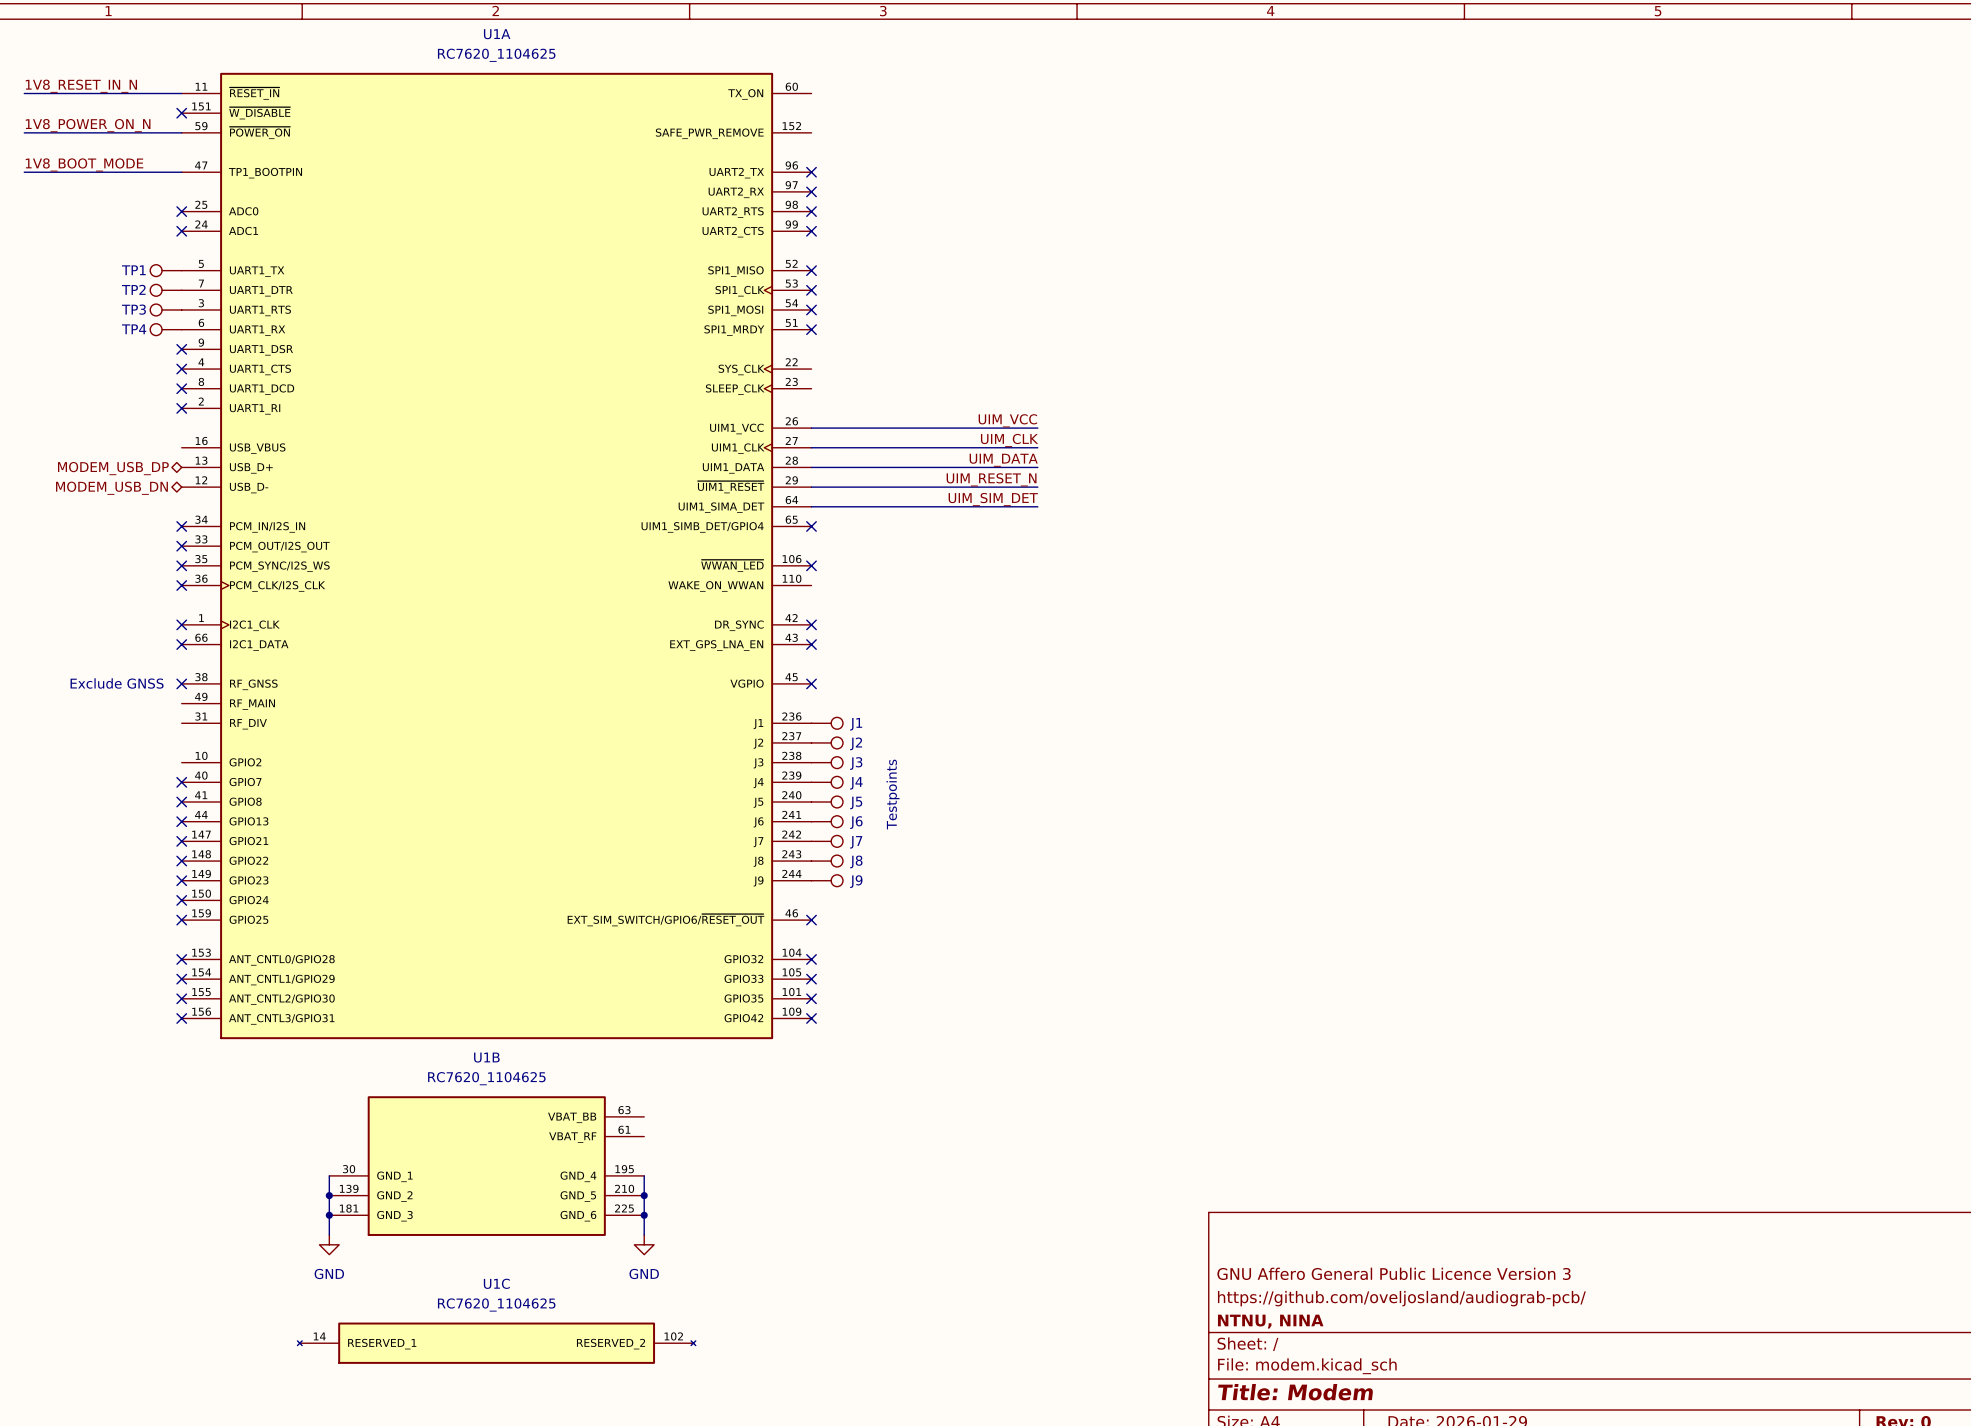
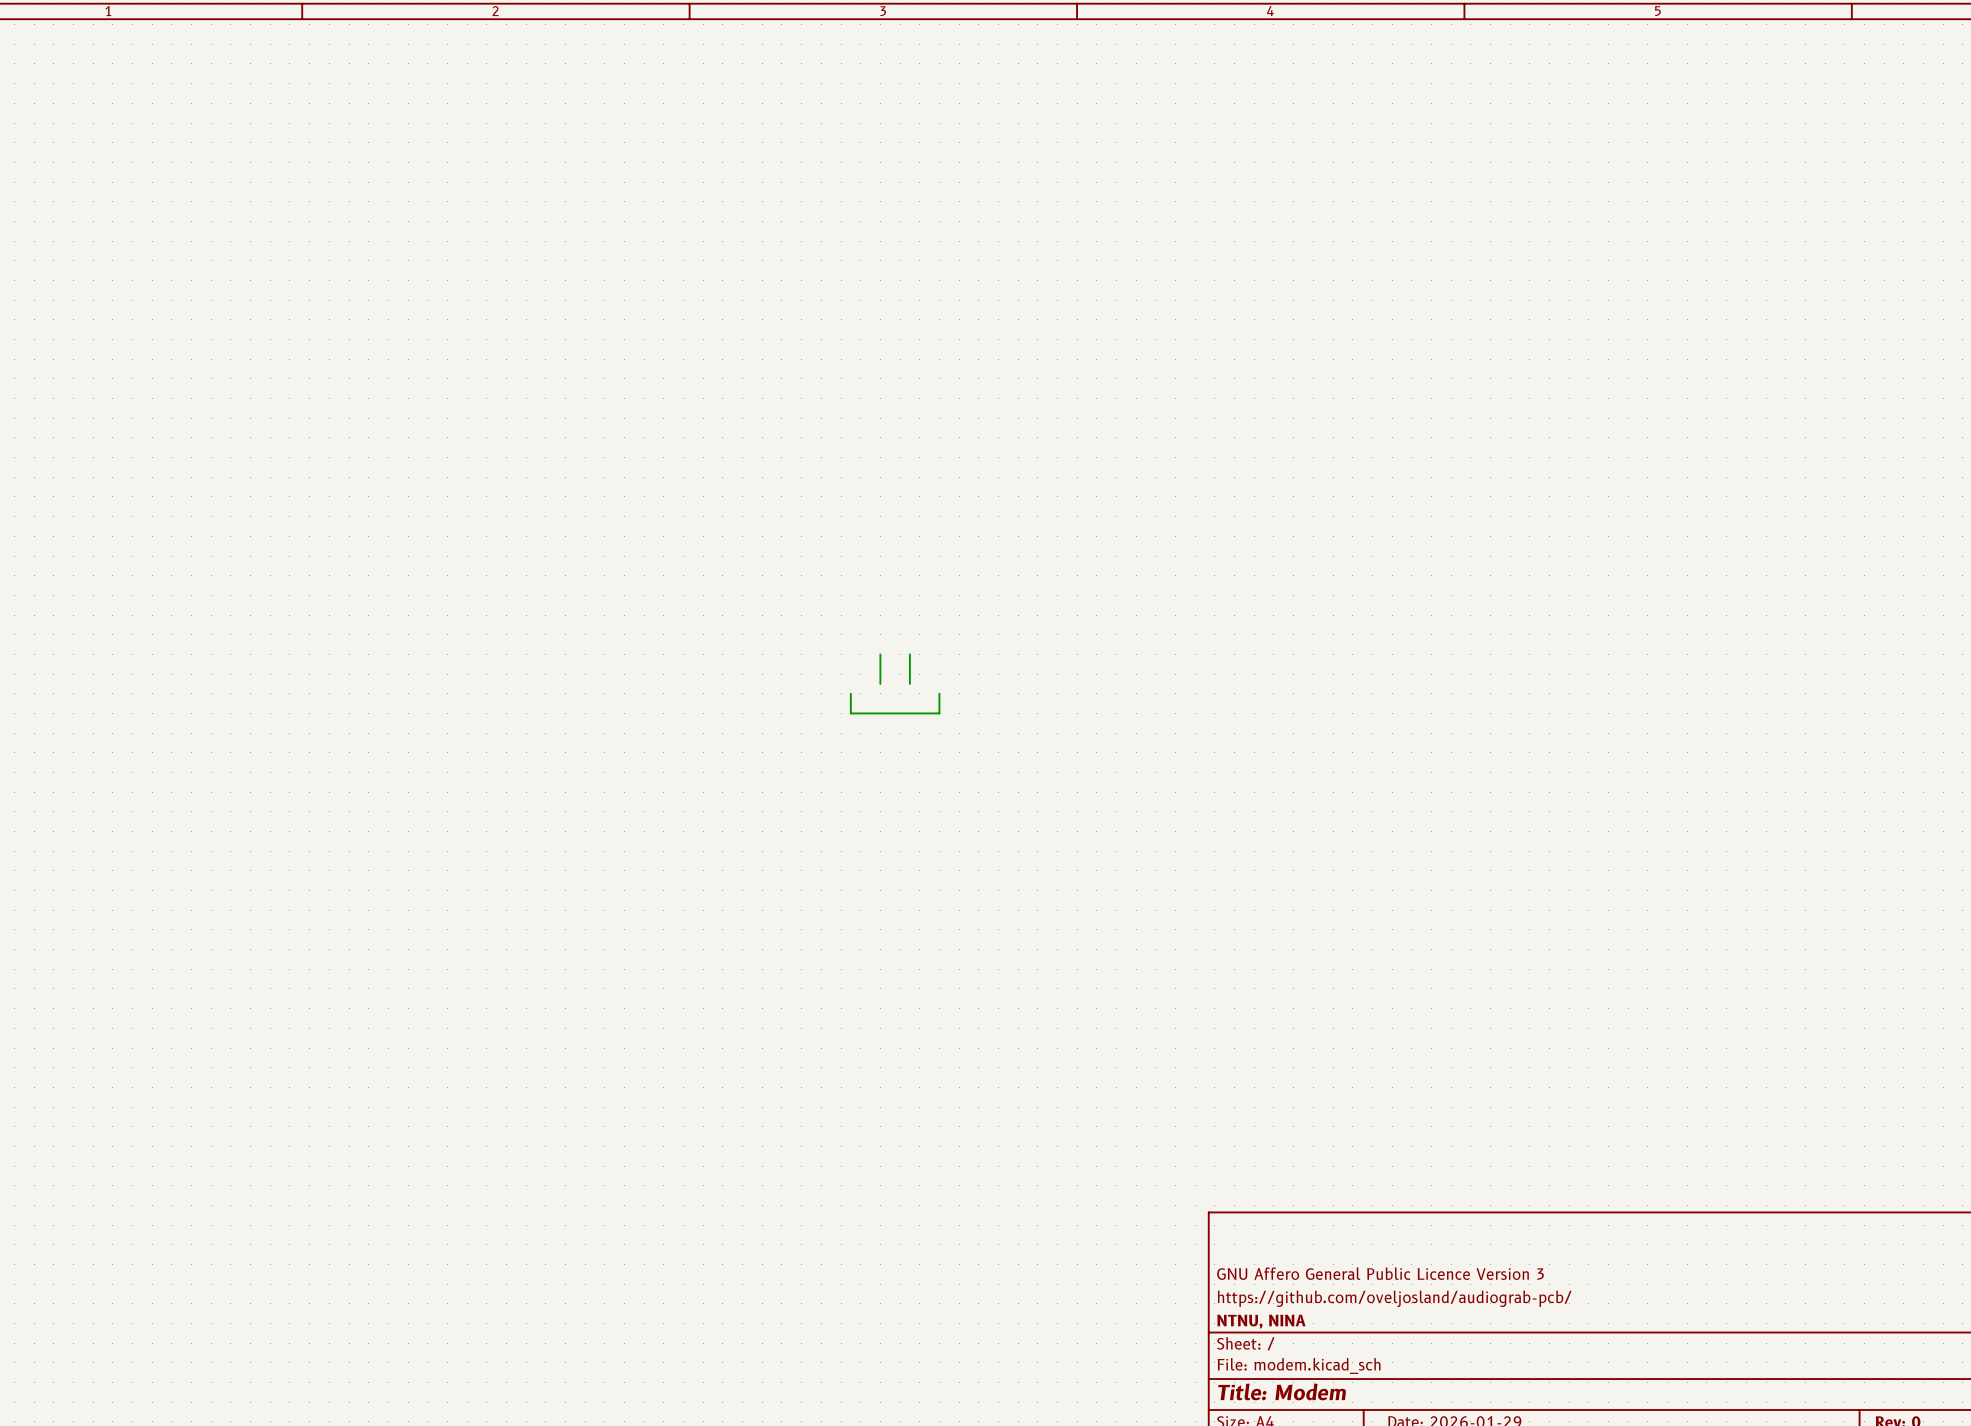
label: 1V8_RESET_IN_N (81, 86) -> none
wire: (24, 93) (181, 93) -> none
no-connect mark: (181, 113) -> none
label: 1V8_POWER_ON_N (88, 125) -> none
wire: (24, 132) (181, 132) -> none
label: 1V8_BOOT_MODE (84, 164) -> none
wire: (24, 172) (181, 172) -> none
no-connect mark: (811, 172) -> none
no-connect mark: (811, 191) -> none
no-connect mark: (181, 211) -> none
no-connect mark: (811, 211) -> none
no-connect mark: (181, 231) -> none
no-connect mark: (811, 231) -> none
TP1: (165, 270) -> none
no-connect mark: (811, 270) -> none
TP2: (165, 290) -> none
no-connect mark: (811, 290) -> none
TP3: (165, 309) -> none
no-connect mark: (811, 309) -> none
TP4: (165, 329) -> none
no-connect mark: (811, 329) -> none
no-connect mark: (181, 349) -> none
no-connect mark: (181, 369) -> none
no-connect mark: (181, 388) -> none
no-connect mark: (181, 408) -> none
label: UIM_VCC (1007, 420) -> none
wire: (811, 428) (1037, 428) -> none
label: UIM_CLK (1009, 440) -> none
wire: (811, 447) (1037, 447) -> none
label: UIM_DATA (1003, 460) -> none
wire: (811, 467) (1037, 467) -> none
hierarchical label: MODEM_USB_DP (113, 468) -> none
label: UIM_RESET_N (991, 479) -> none
wire: (811, 487) (1037, 487) -> none
hierarchical label: MODEM_USB_DN (111, 488) -> none
label: UIM_SIM_DET (993, 499) -> none
wire: (811, 506) (1037, 506) -> none
no-connect mark: (181, 526) -> none
no-connect mark: (811, 526) -> none
no-connect mark: (181, 546) -> none
U1A: RC7620_1104625 (496, 556) -> none
no-connect mark: (181, 565) -> none
no-connect mark: (811, 565) -> none
no-connect mark: (181, 585) -> none
no-connect mark: (181, 624) -> none
no-connect mark: (811, 624) -> none
no-connect mark: (181, 644) -> none
no-connect mark: (811, 644) -> none
wire: none -> (880, 654) (880, 683)
wire: none -> (909, 654) (909, 683)
text: Exclude GNSS (117, 683) -> none
no-connect mark: (181, 683) -> none
no-connect mark: (811, 683) -> none
wire: none -> (850, 693) (850, 713) (939, 713) (939, 693)
J1: (827, 723) -> none
J2: (827, 742) -> none
J3: (827, 762) -> none
no-connect mark: (181, 782) -> none
J4: (827, 782) -> none
text: Testpoints (893, 794) -> none
no-connect mark: (181, 802) -> none
J5: (827, 802) -> none
no-connect mark: (181, 821) -> none
J6: (827, 821) -> none
no-connect mark: (181, 841) -> none
J7: (827, 841) -> none
no-connect mark: (181, 861) -> none
J8: (827, 861) -> none
no-connect mark: (181, 880) -> none
J9: (827, 880) -> none
no-connect mark: (181, 900) -> none
no-connect mark: (181, 920) -> none
no-connect mark: (811, 920) -> none
no-connect mark: (181, 959) -> none
no-connect mark: (811, 959) -> none
no-connect mark: (181, 979) -> none
no-connect mark: (811, 979) -> none
no-connect mark: (181, 998) -> none
no-connect mark: (811, 998) -> none
no-connect mark: (181, 1018) -> none
no-connect mark: (811, 1018) -> none
U1B: RC7620_1104625 (486, 1166) -> none
wire: (329, 1175) (329, 1234) -> none
wire: (644, 1175) (644, 1234) -> none
junction: (329, 1195) -> none
junction: (644, 1195) -> none
junction: (329, 1215) -> none
junction: (644, 1215) -> none
power symbol: GND (329, 1244) -> none
power symbol: GND (644, 1244) -> none
U1C: RC7620_1104625 (496, 1343) -> none

